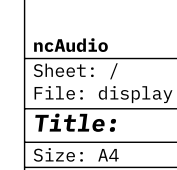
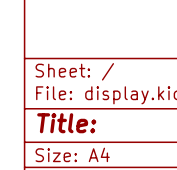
title block: ncAudio (70, 45) -> none

